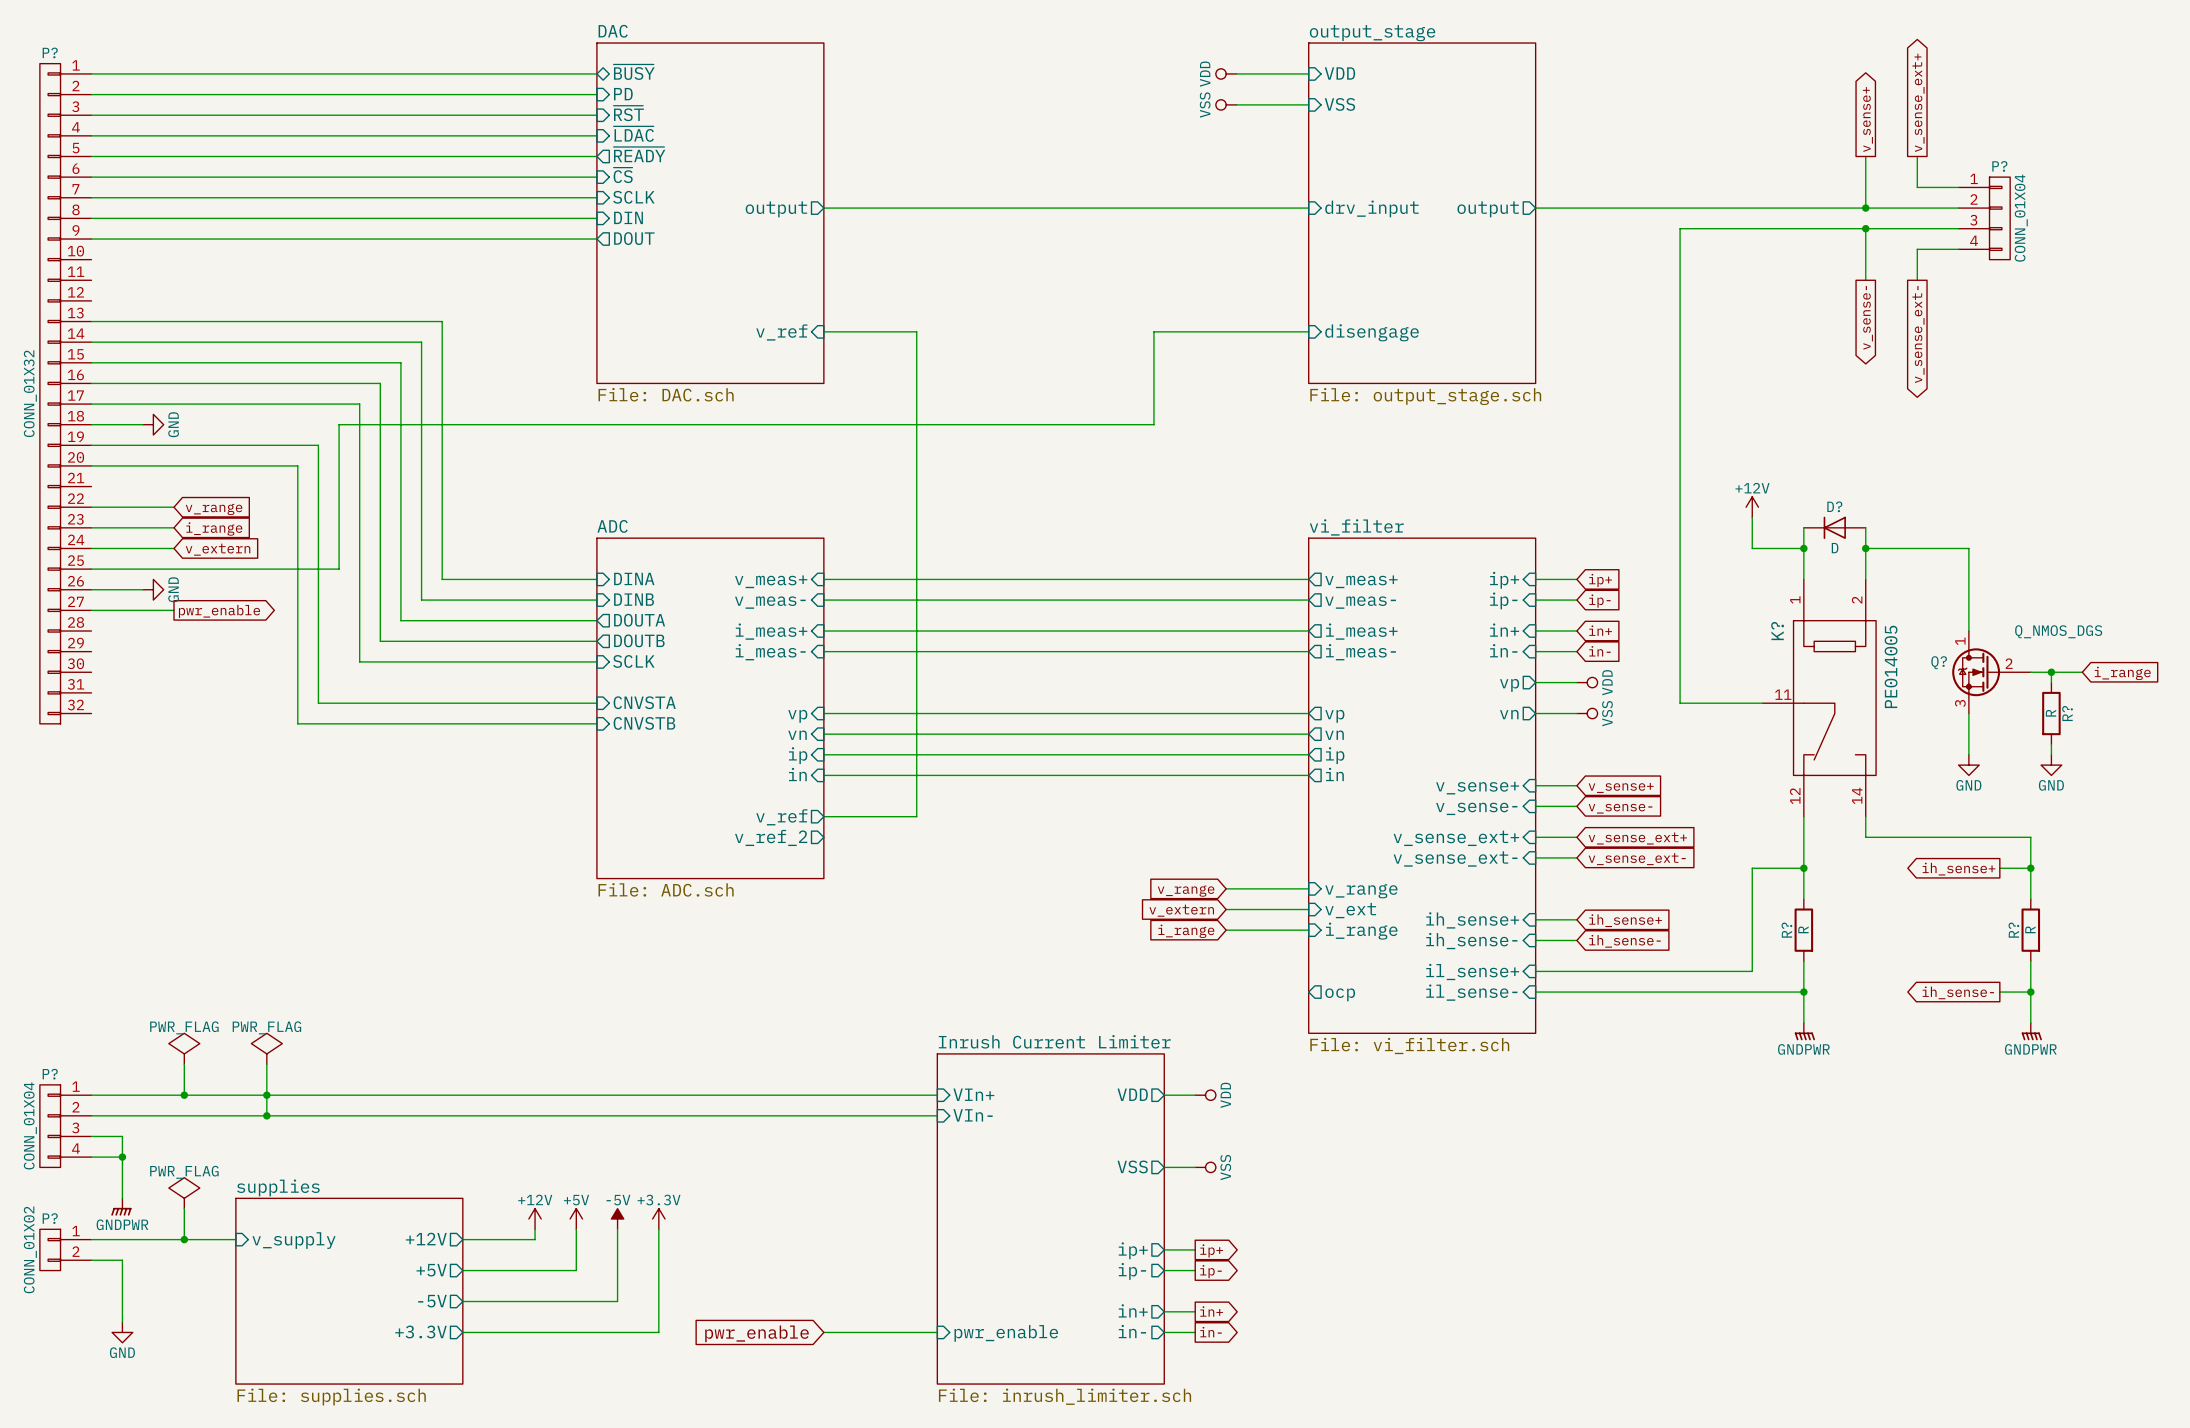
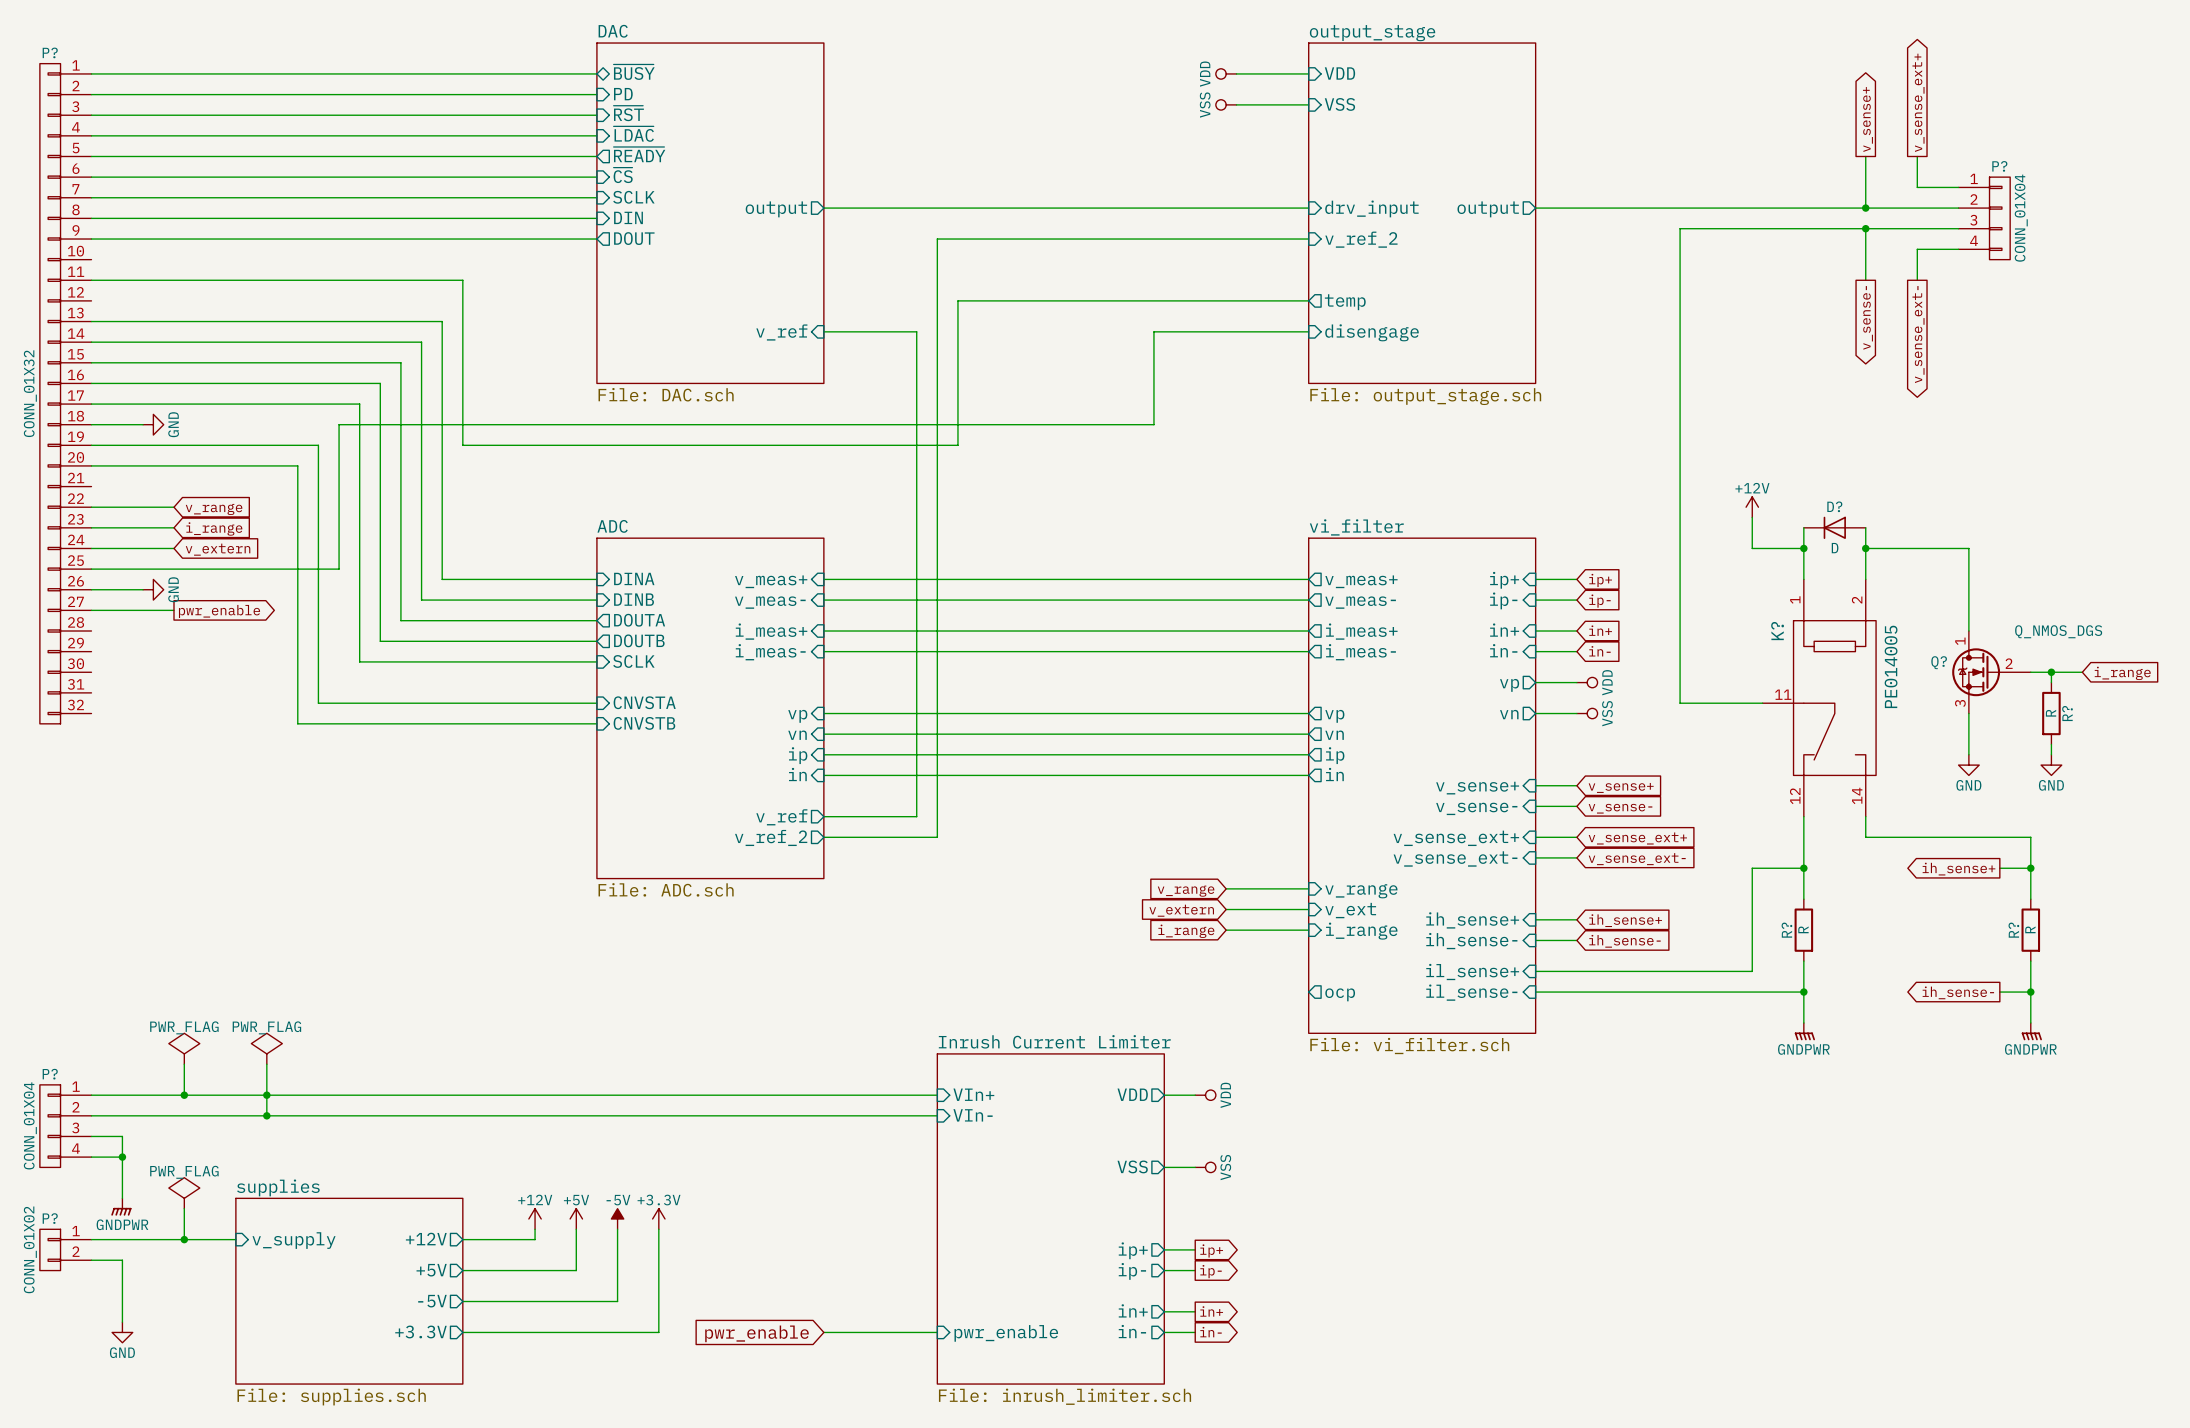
wire: none -> (1308, 239) (937, 239) (937, 837) (823, 837)
sheet pin: none -> v_ref_2 (1361, 239)
wire: none -> (91, 280) (462, 280) (462, 445) (957, 445) (957, 300) (1308, 300)
sheet pin: none -> temp (1345, 302)

